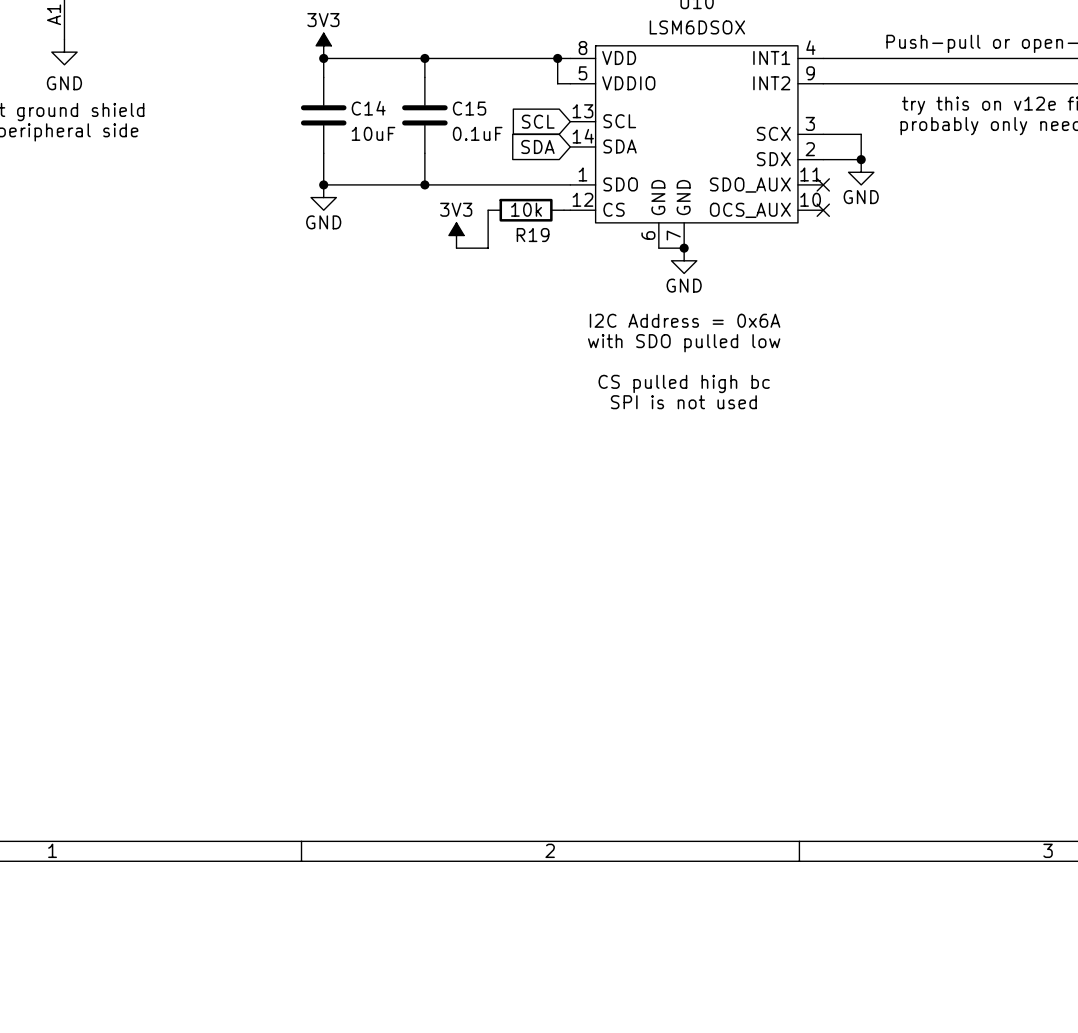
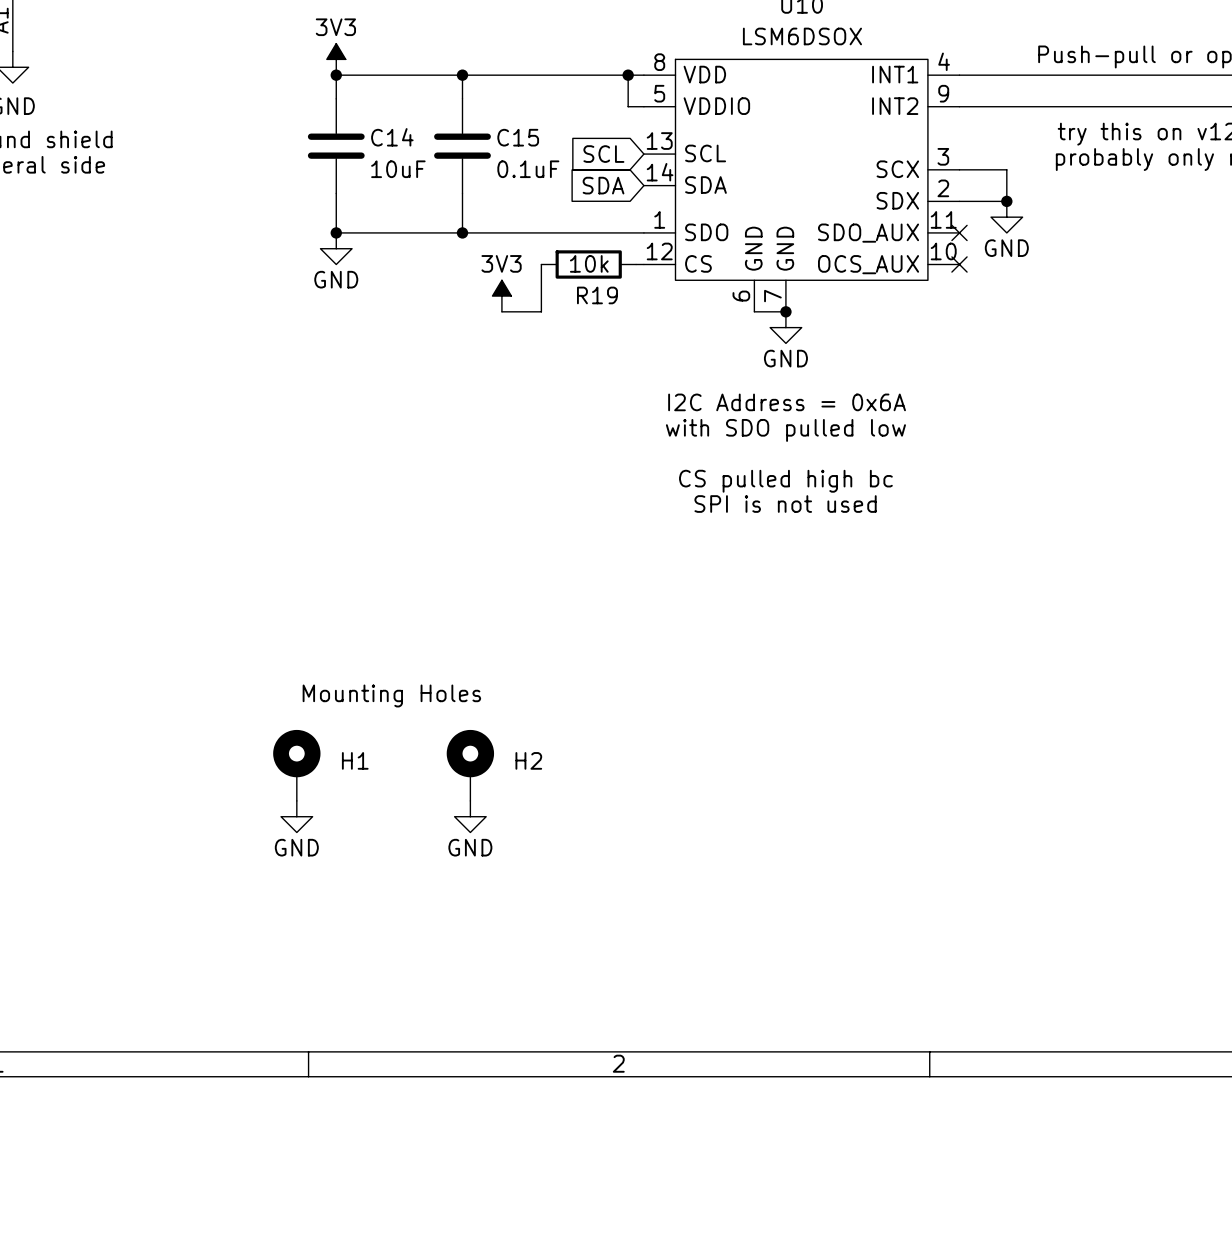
text: none -> Mounting Holes (391, 695)
H1: none -> (296, 765)
H2: none -> (470, 765)
power symbol: none -> GND (296, 816)
power symbol: none -> GND (470, 816)

